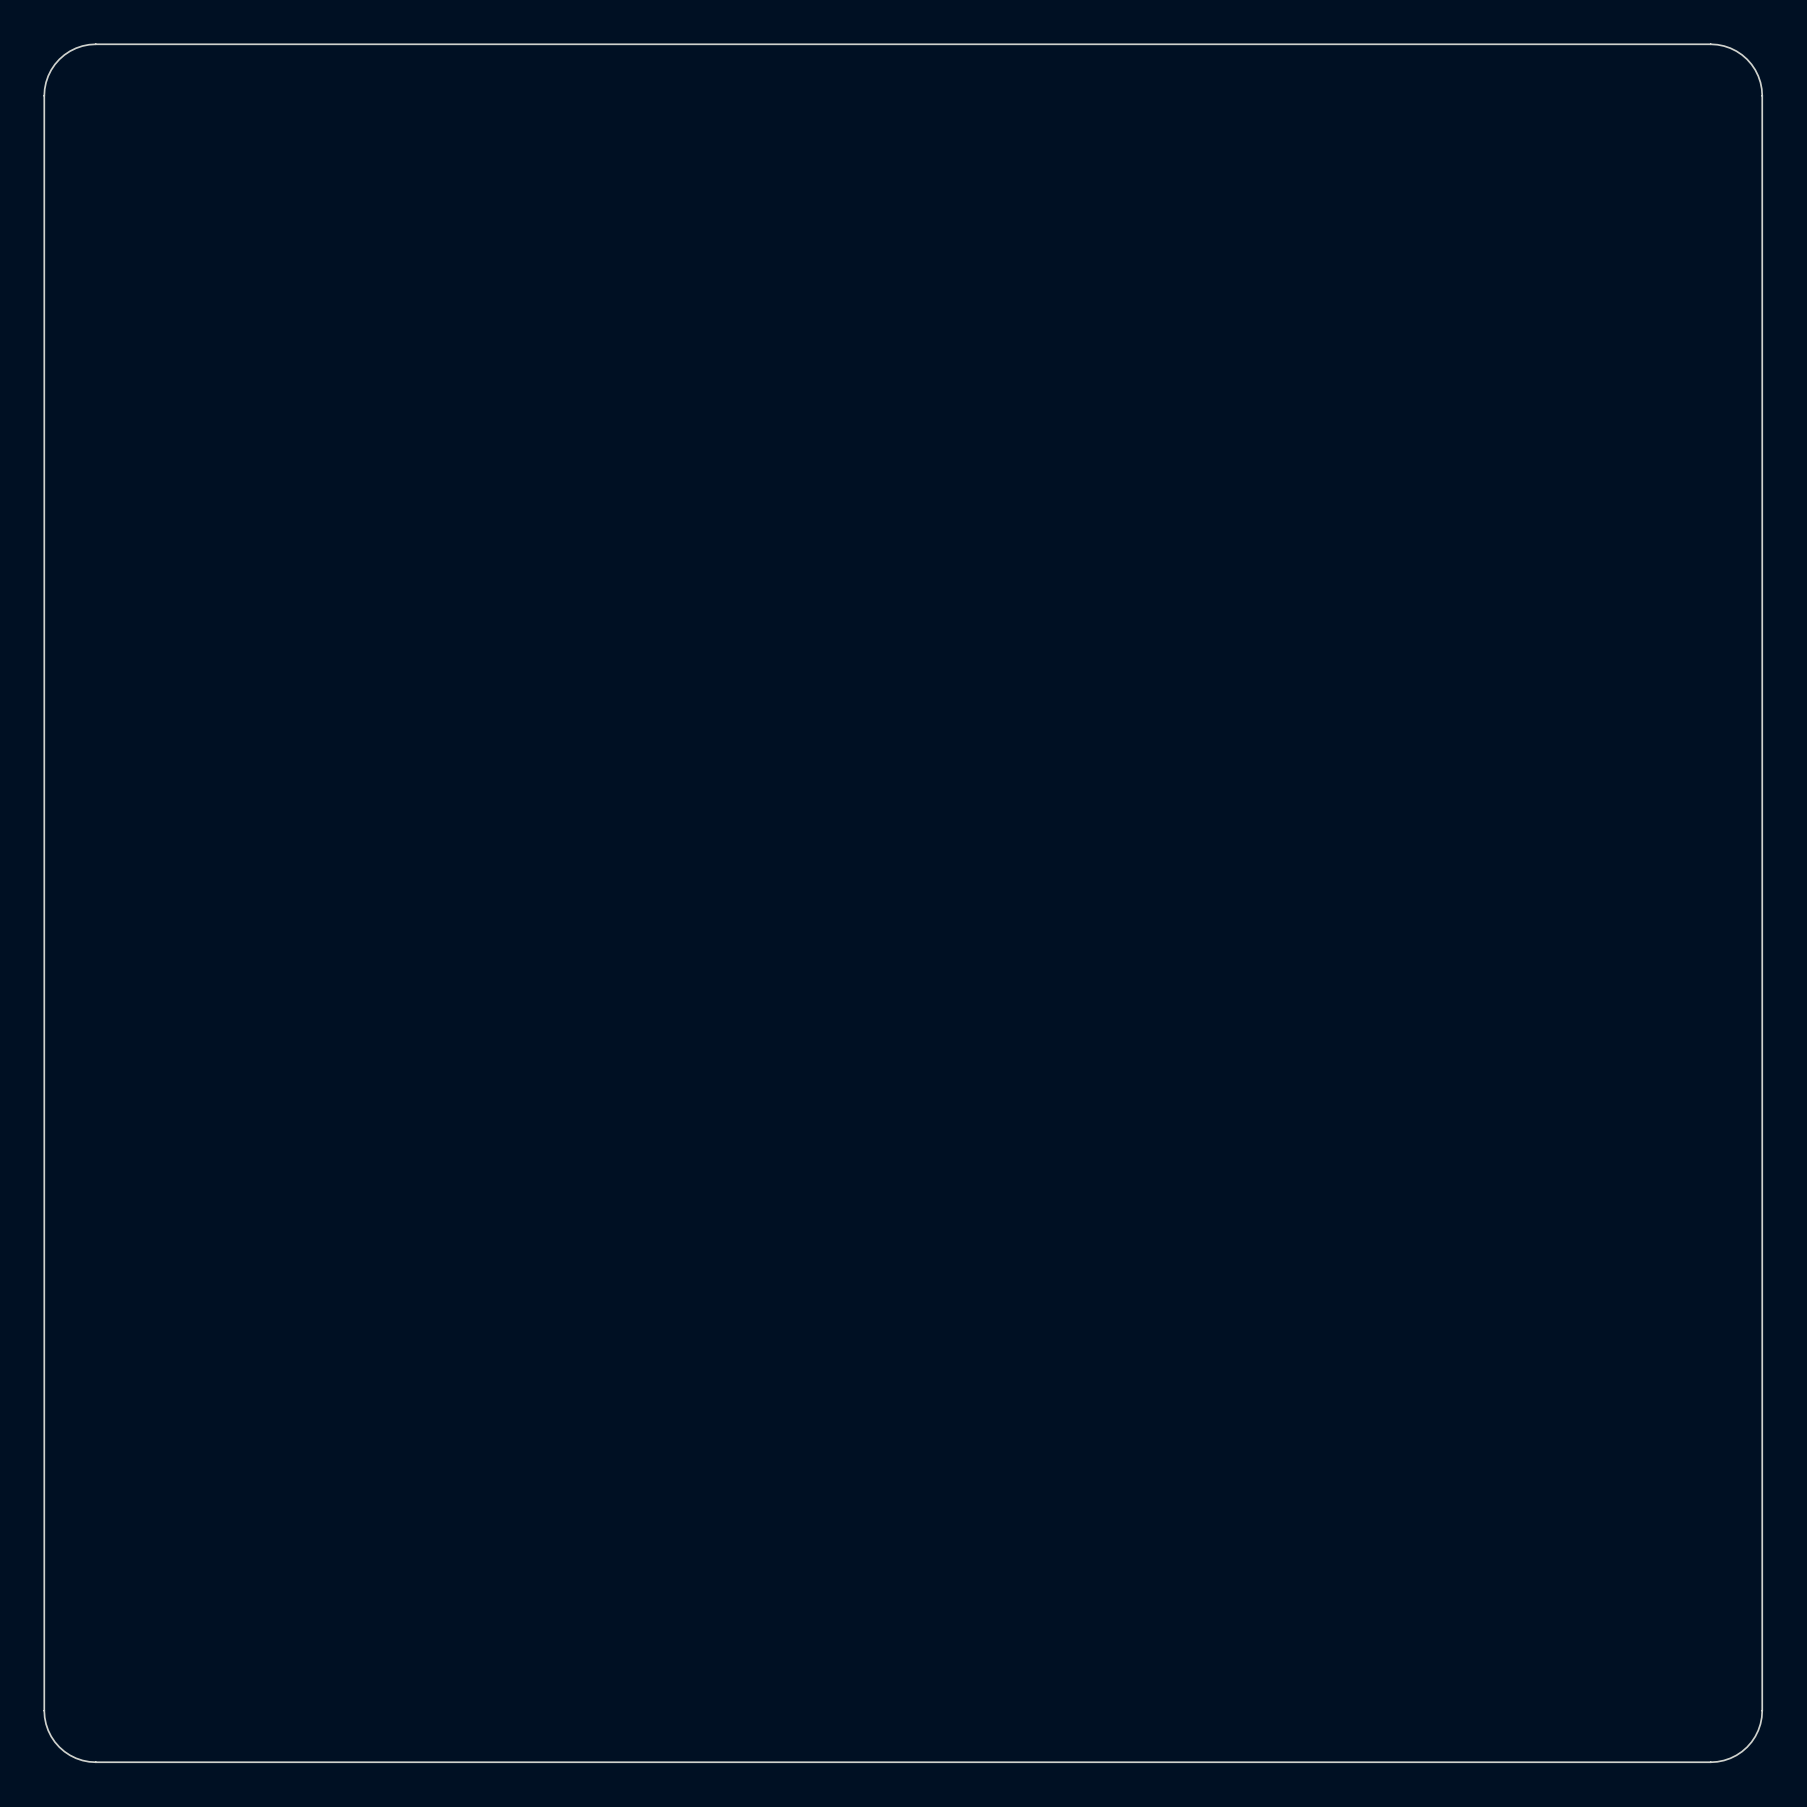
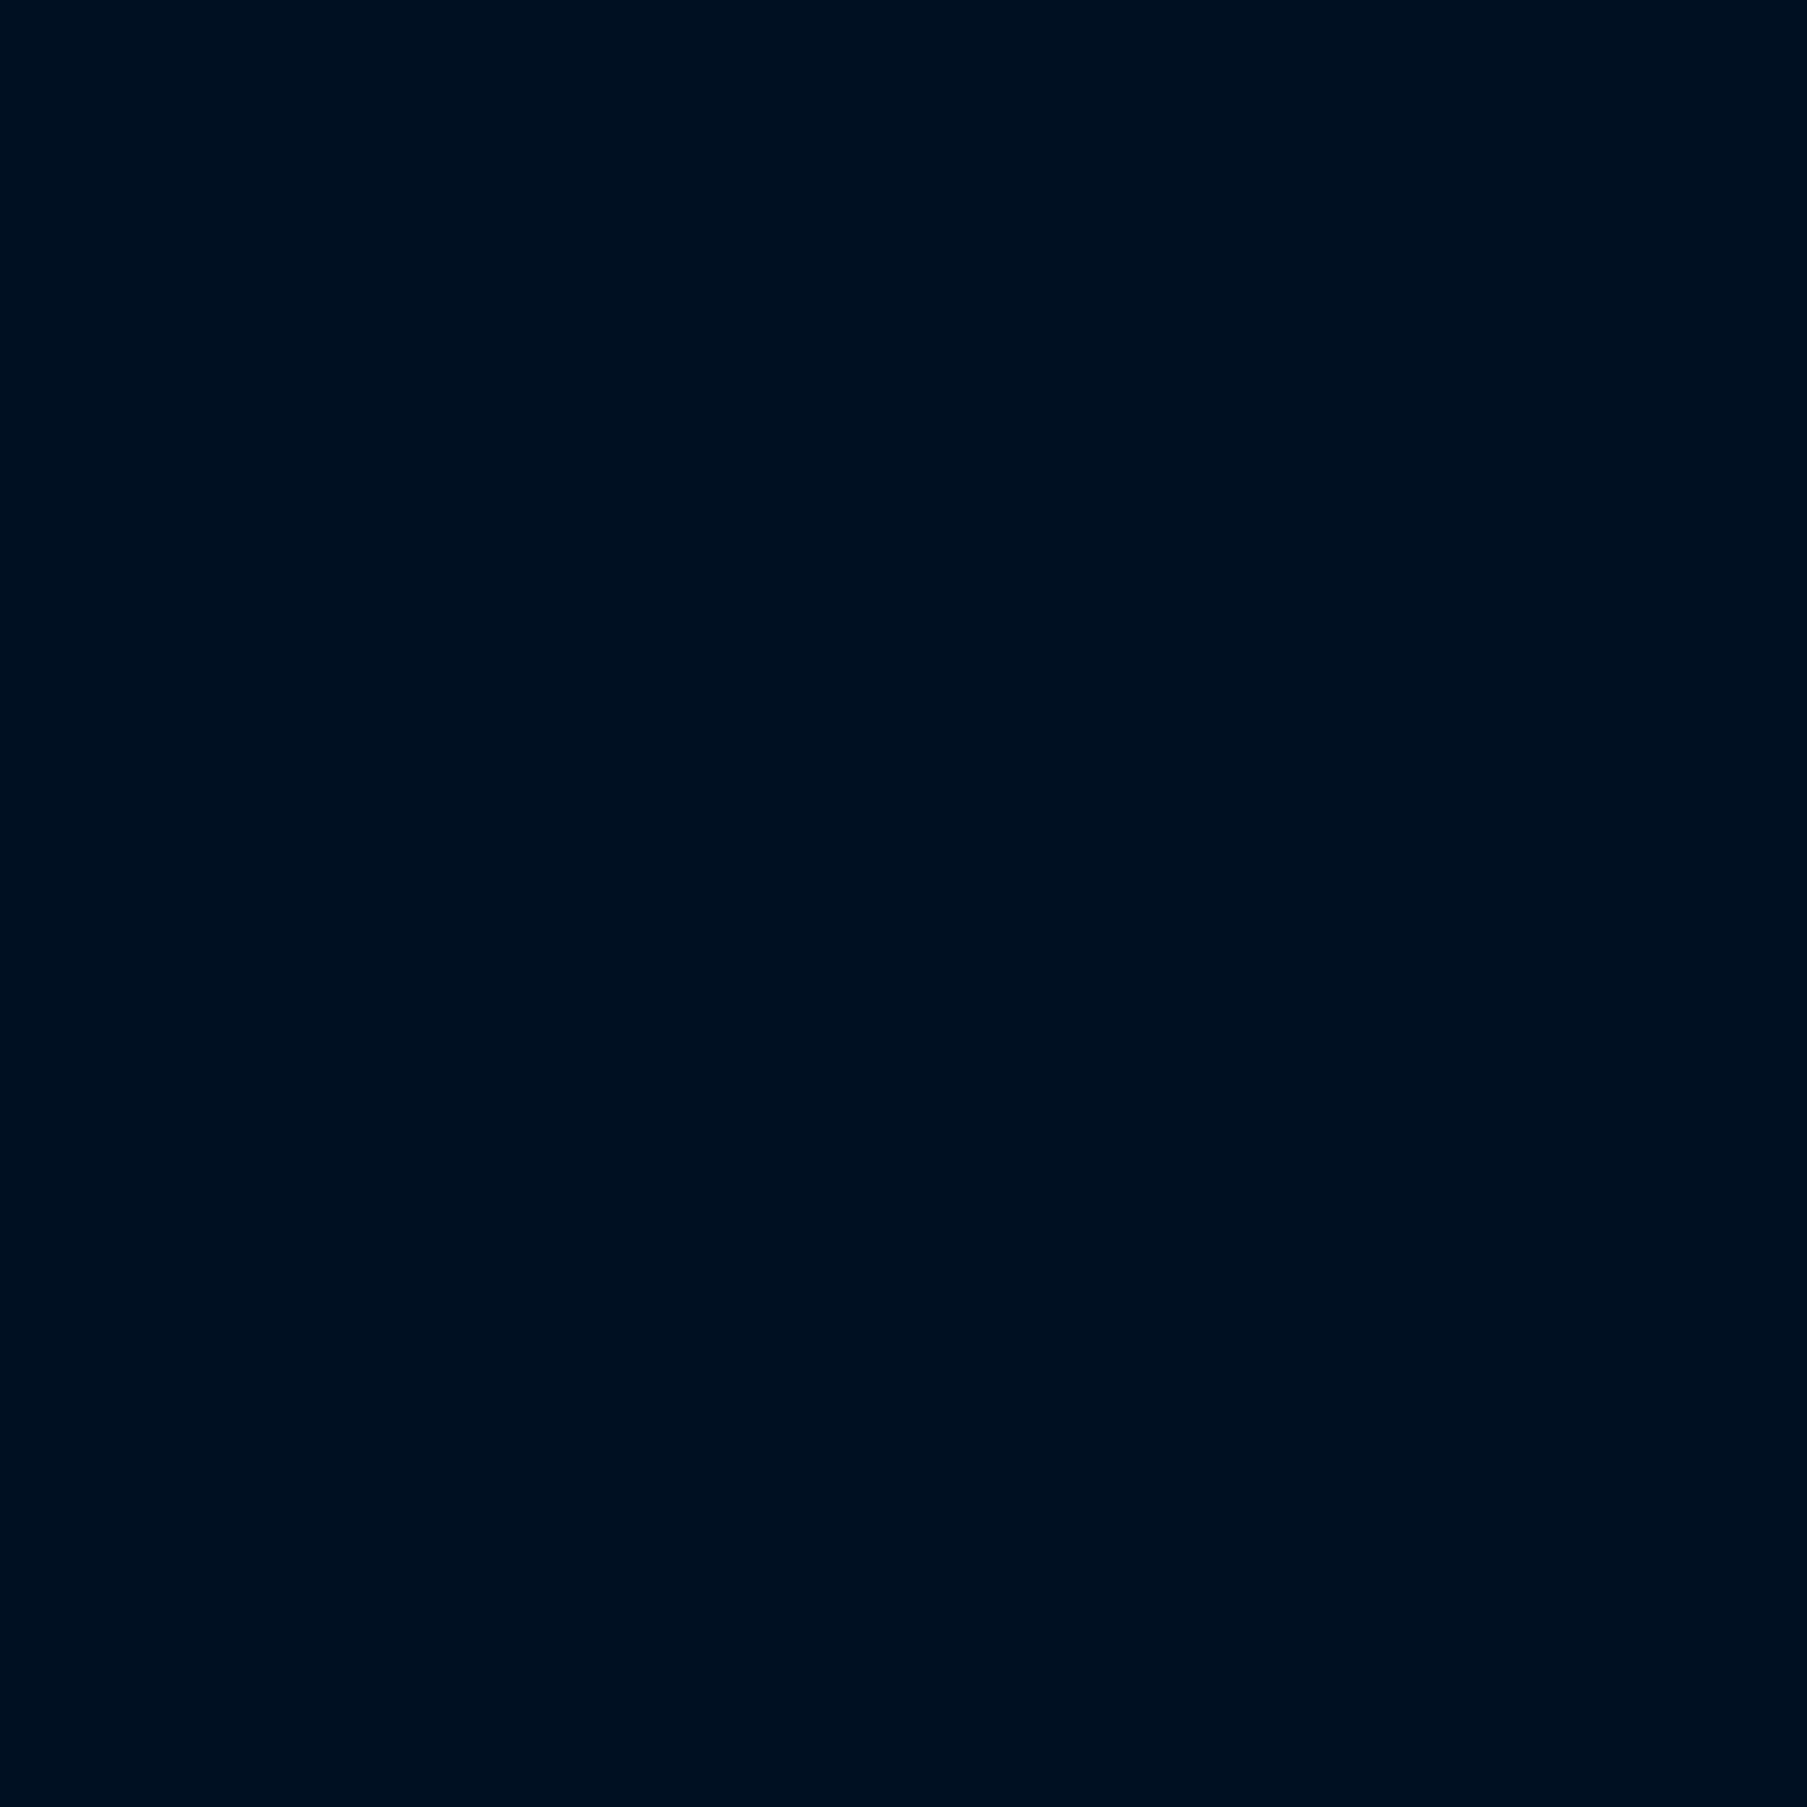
board edge: (1710, 44) (95, 44) (76, 48) (59, 59) (48, 76) (44, 95) (44, 1710) (48, 1730) (59, 1747) (76, 1758) (95, 1762) (1710, 1762) (1730, 1758) (1747, 1747) (1758, 1730) (1762, 1710) (1762, 95) (1758, 76) (1747, 59) (1730, 48) (1710, 44) -> none

